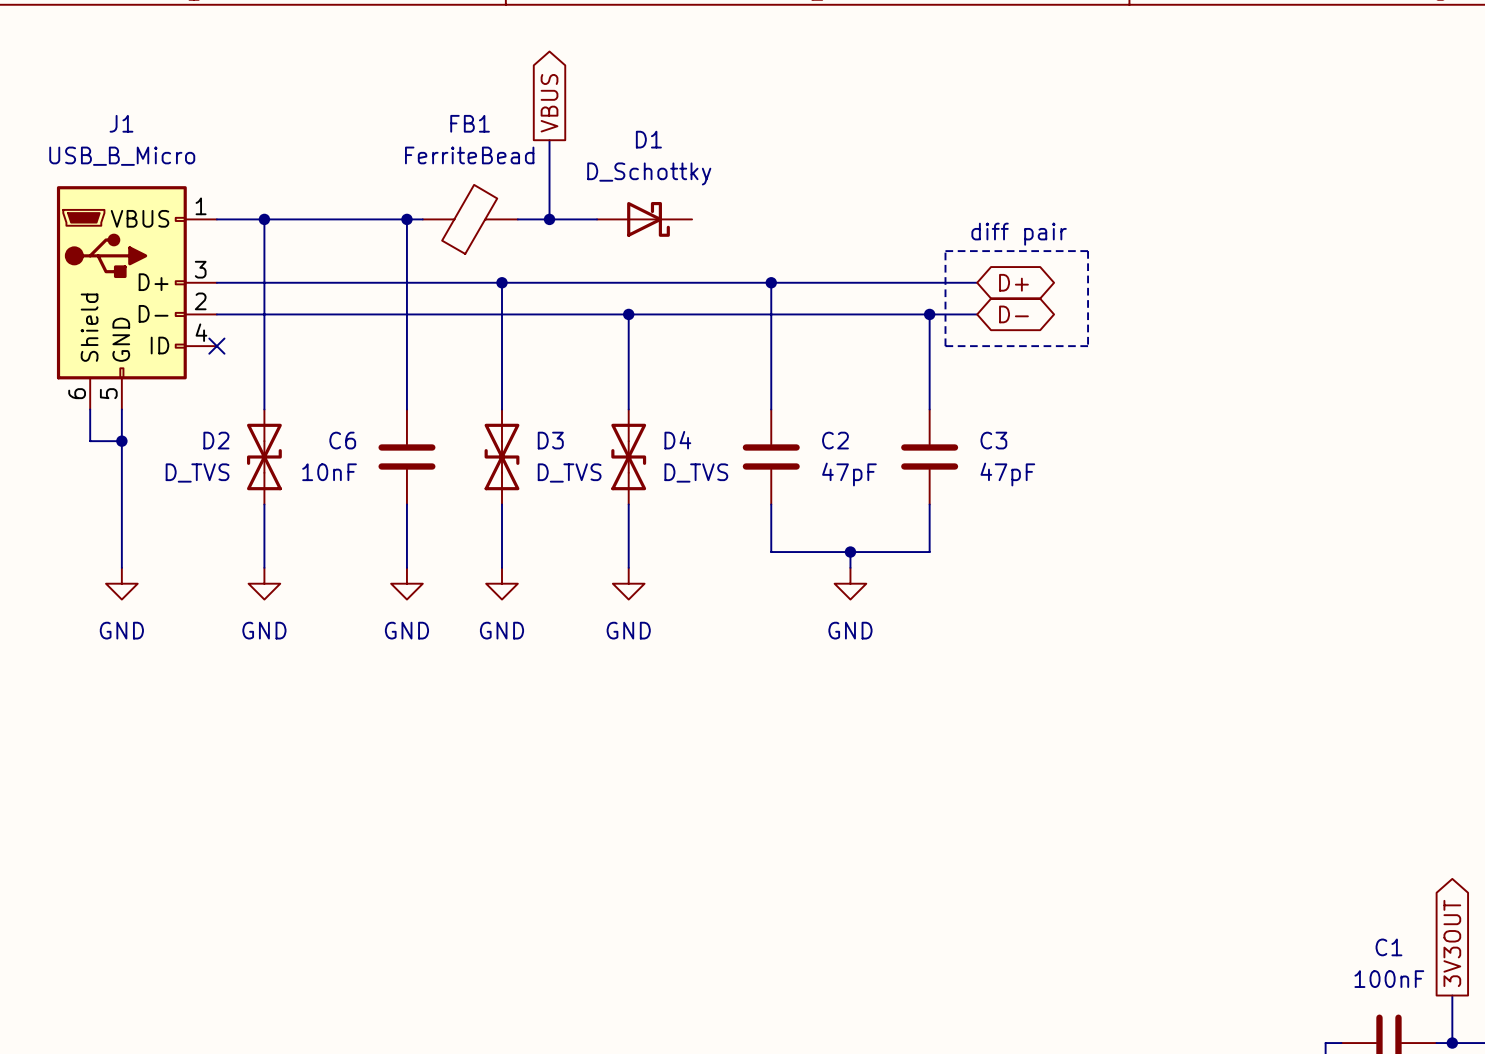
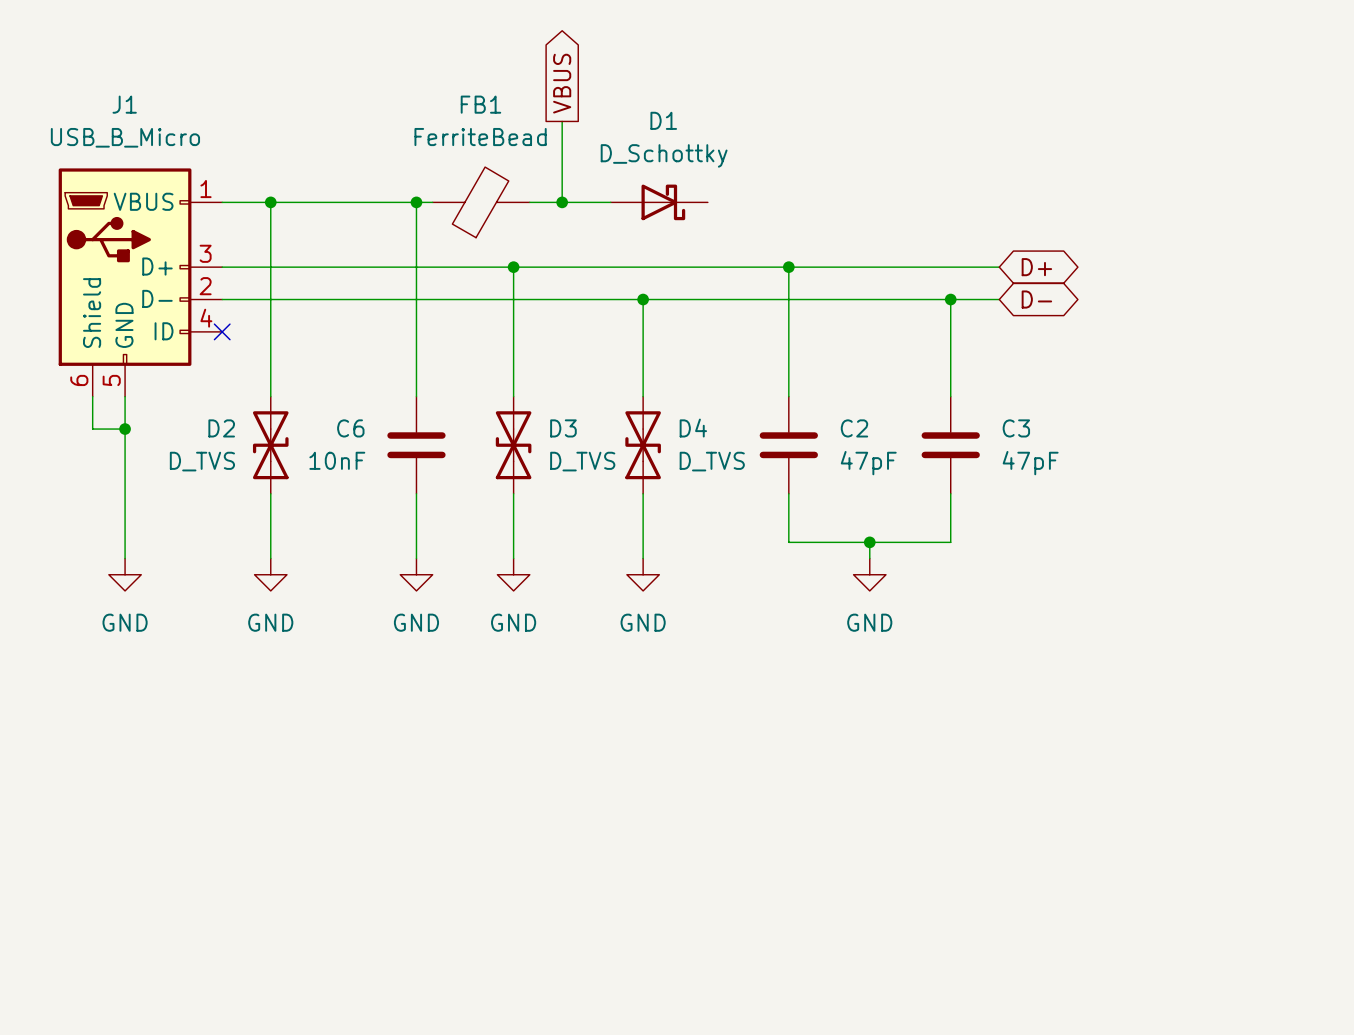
text: diff pair (1019, 234) -> none
line: (945, 251) (1088, 251) (1088, 346) (945, 346) (945, 251) -> none

